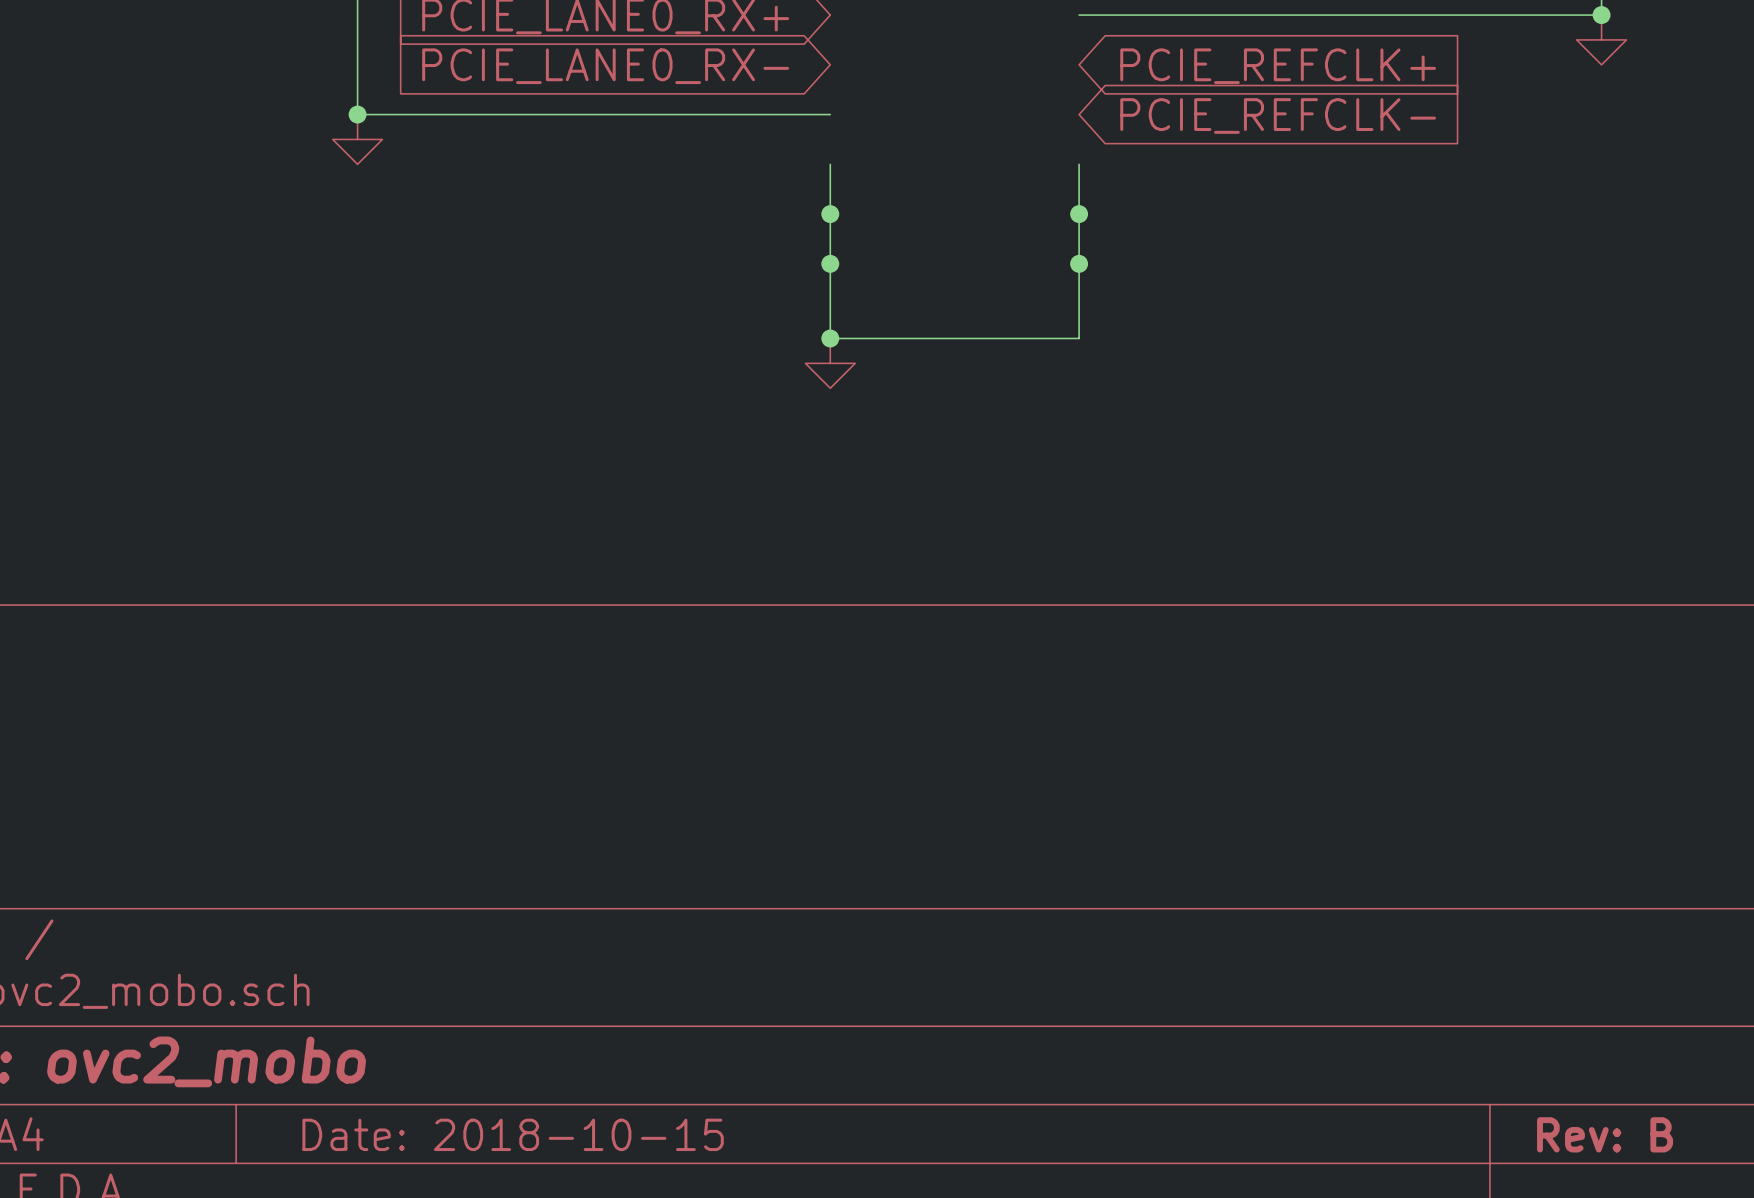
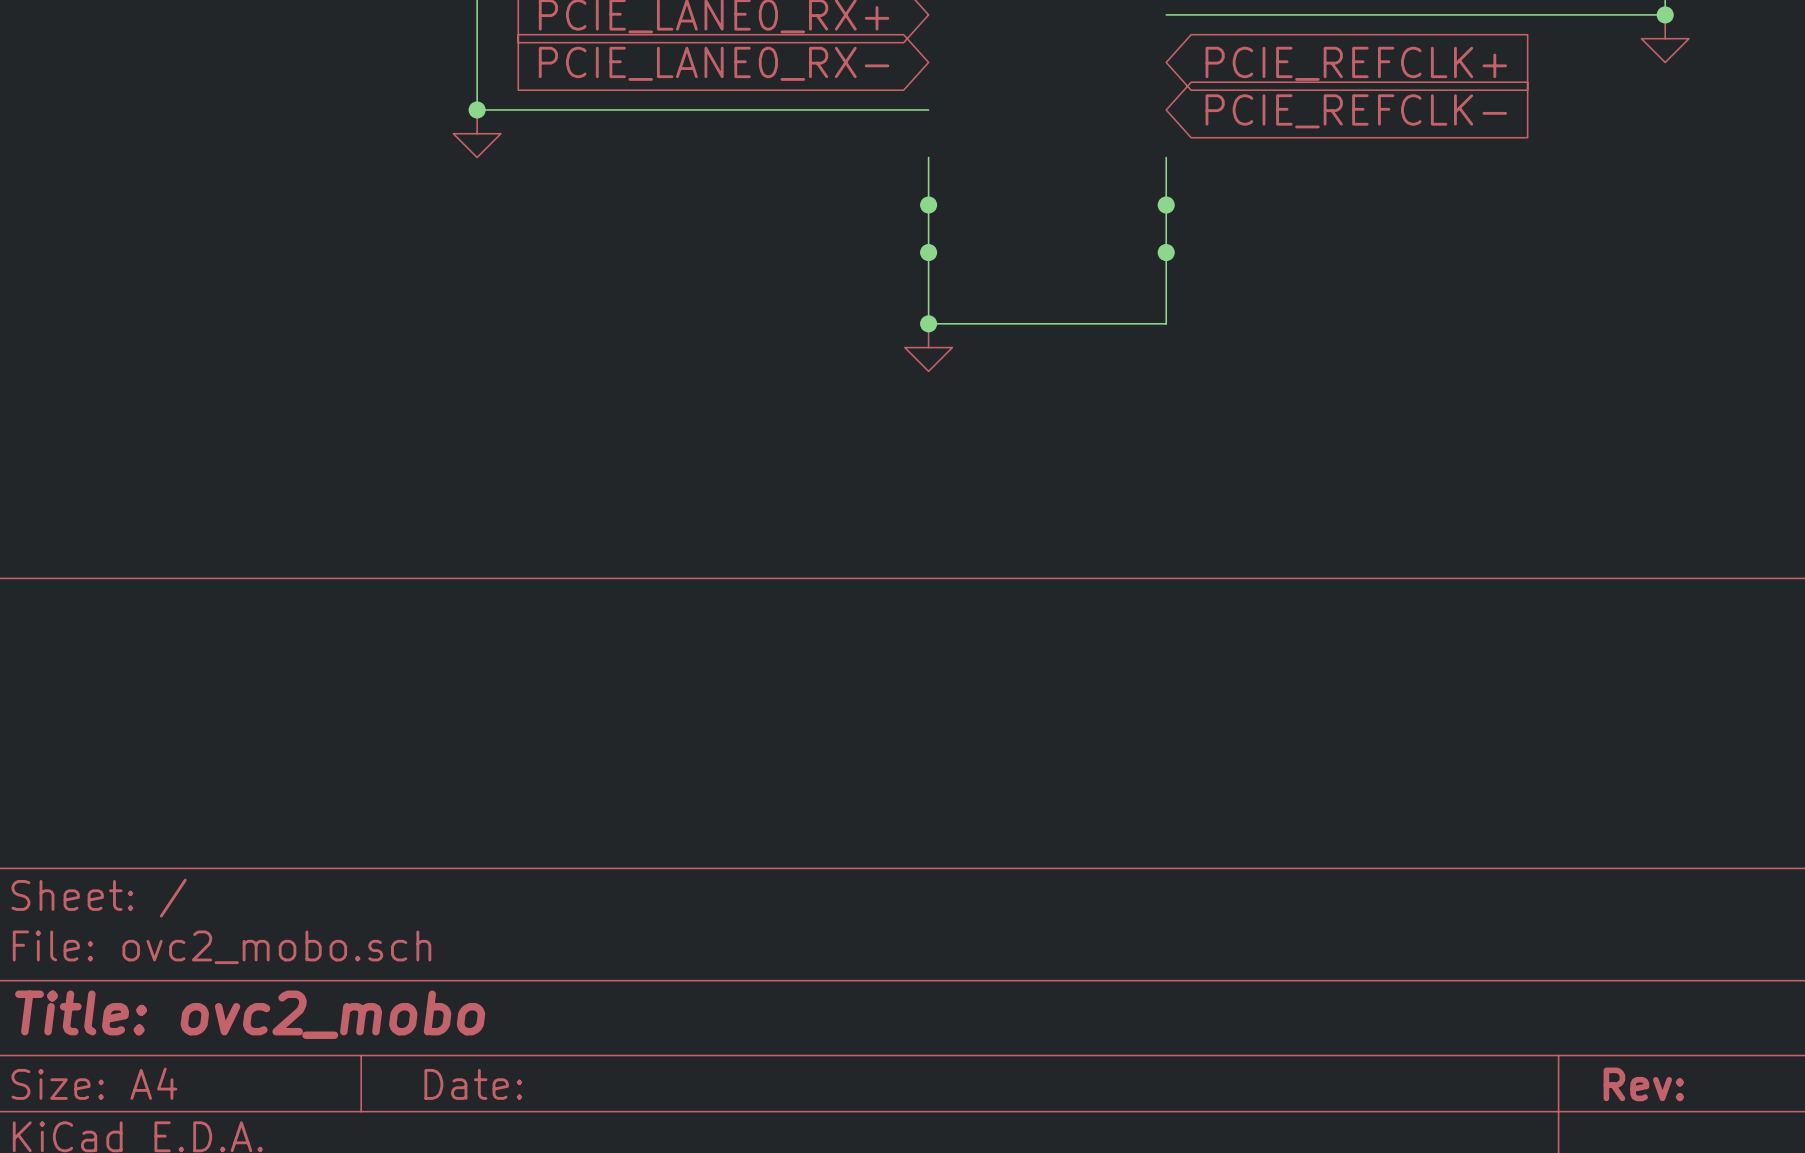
title block: Date: 2018-10-15 (513, 1134) -> Date: (473, 1084)
title block: Rev: B (1605, 1134) -> Rev: (1643, 1084)

